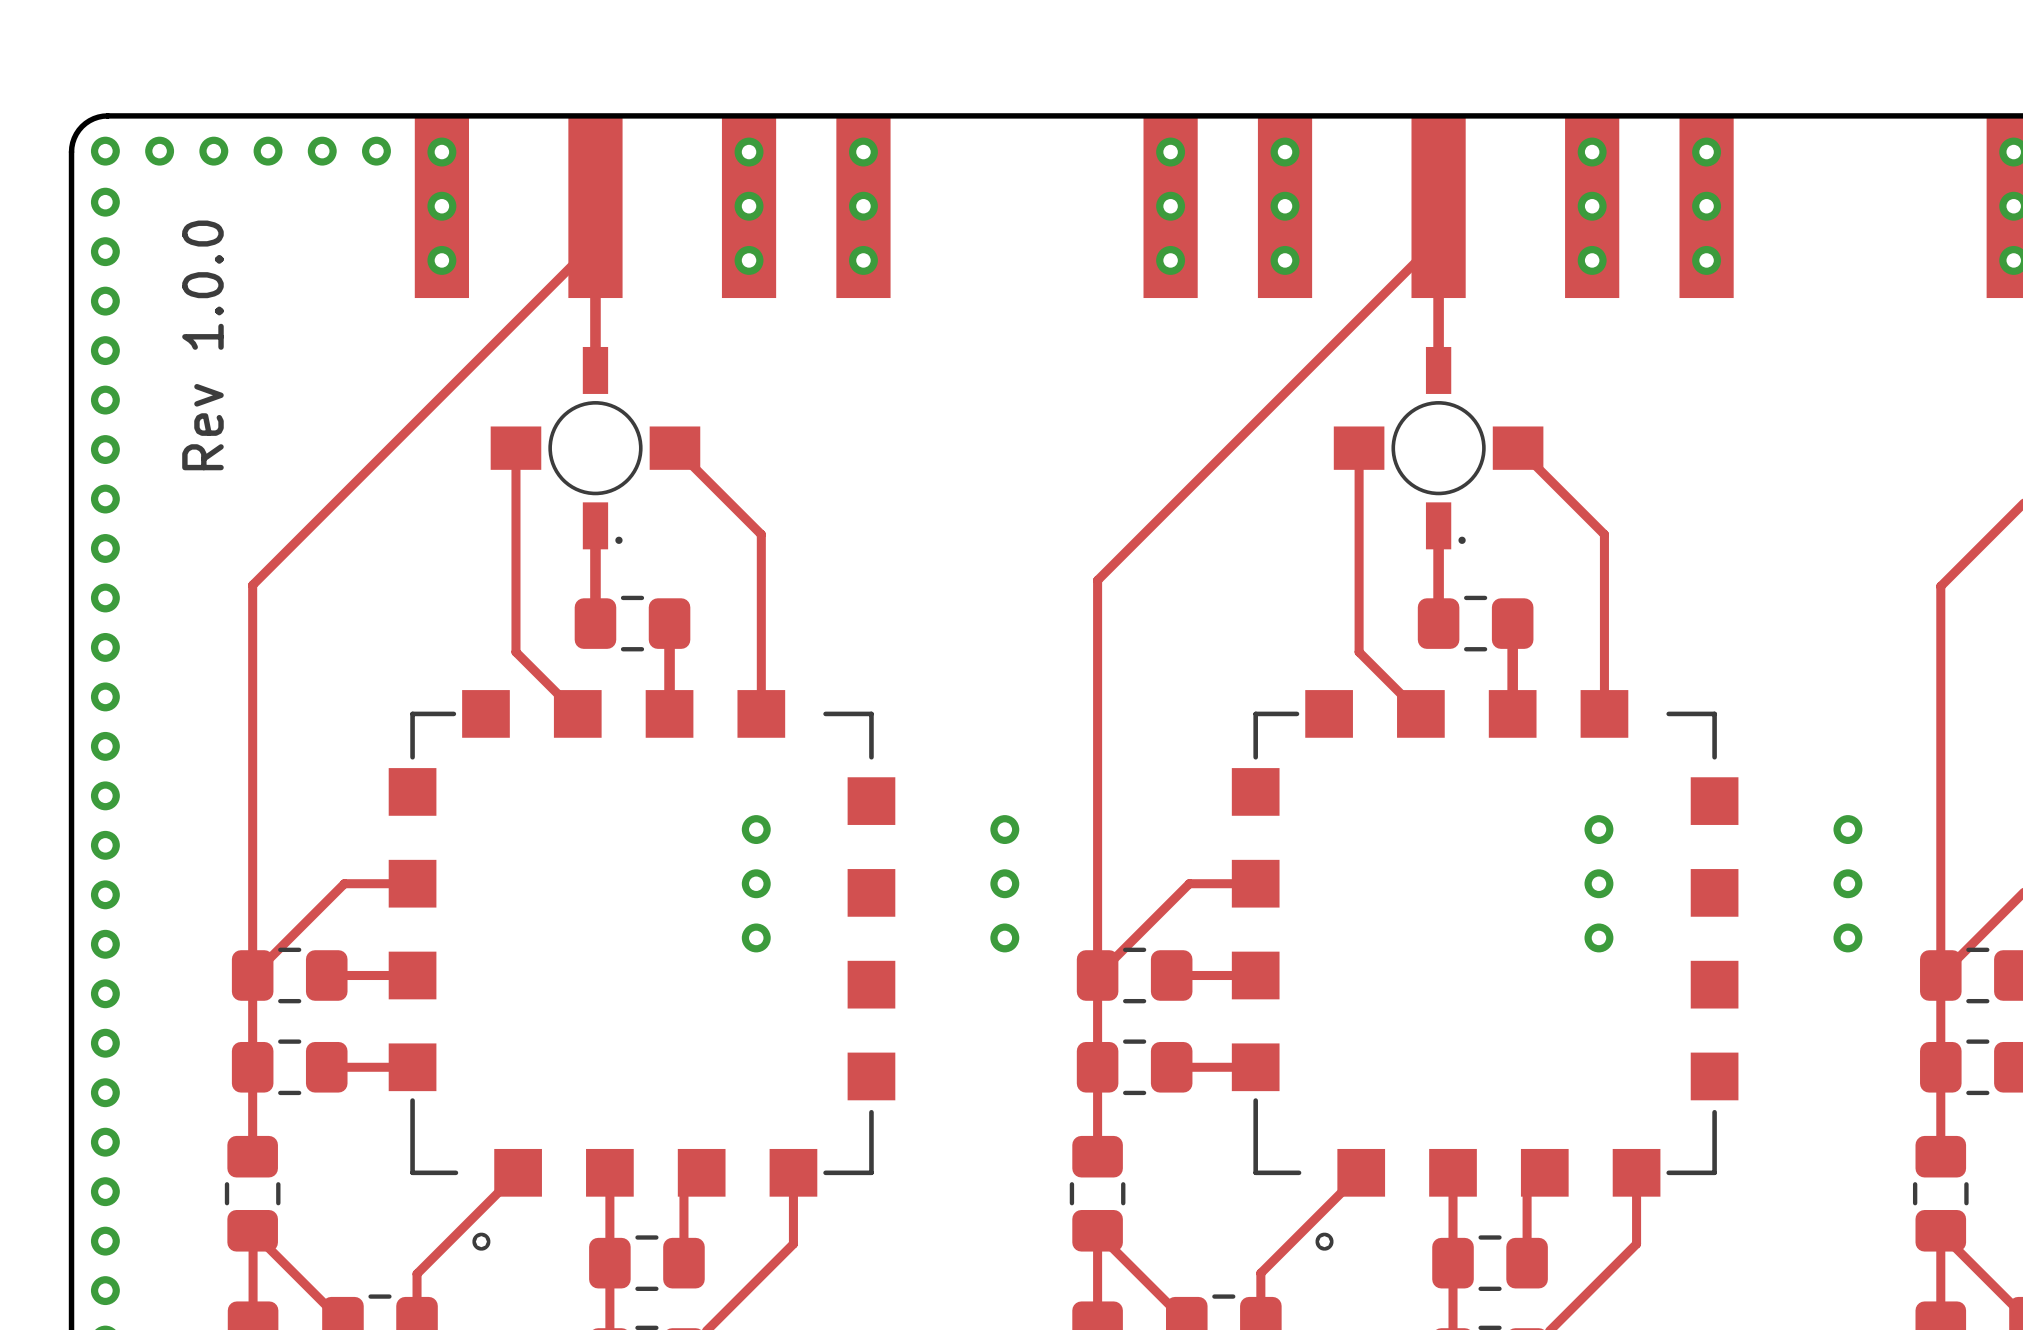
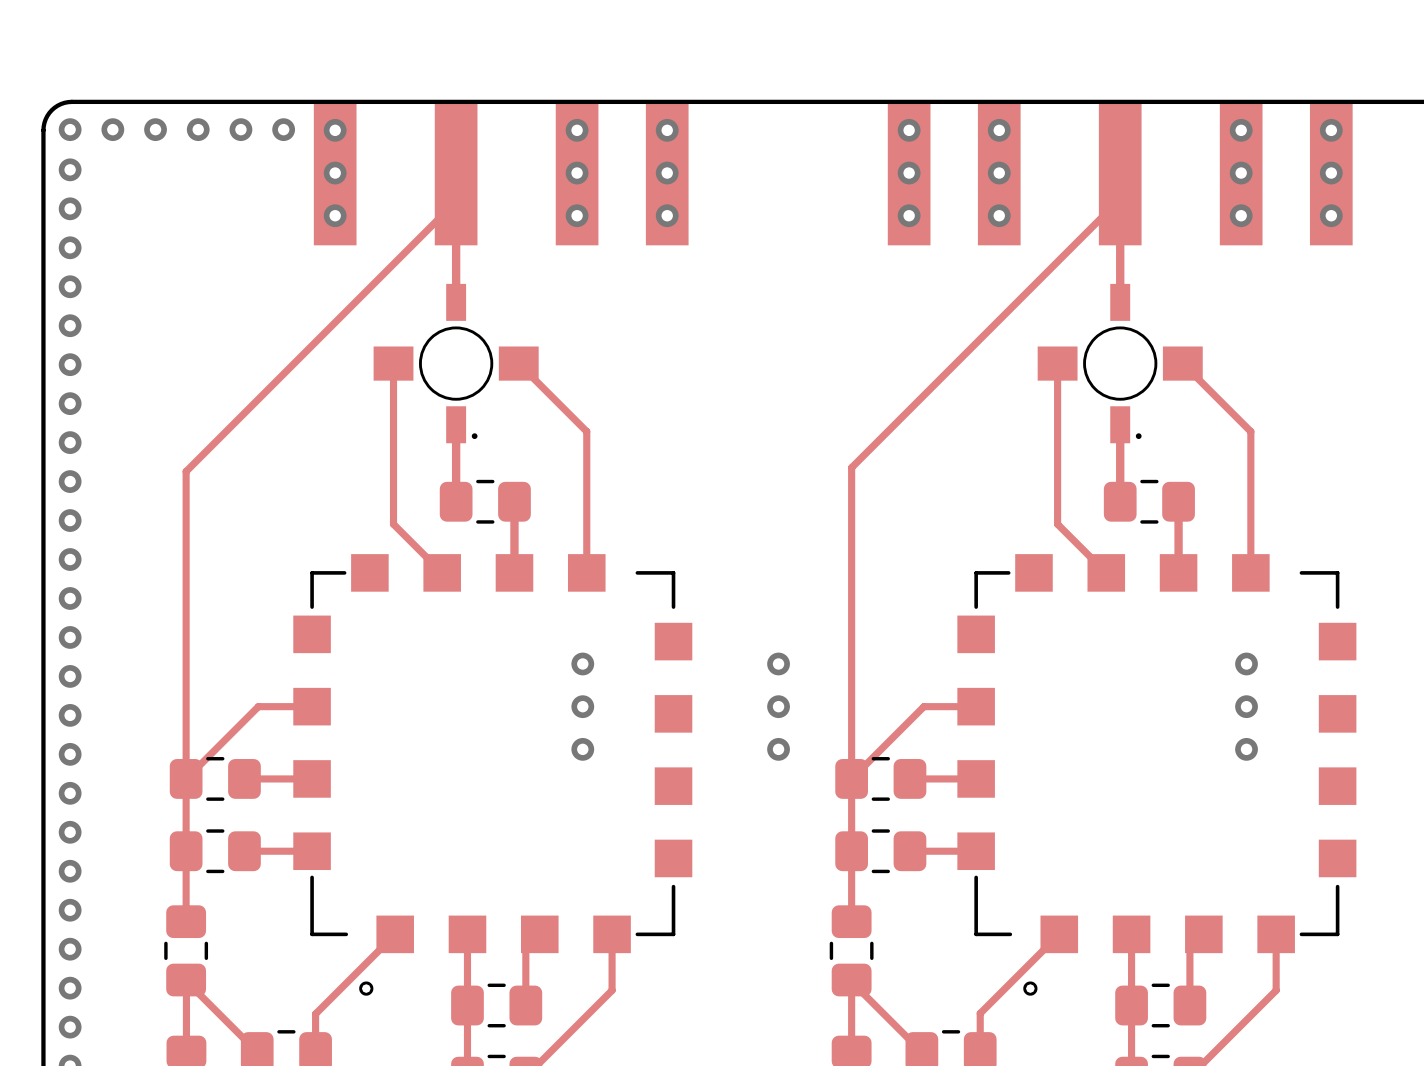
text: Rev 1.0.0 (202, 345) -> none

